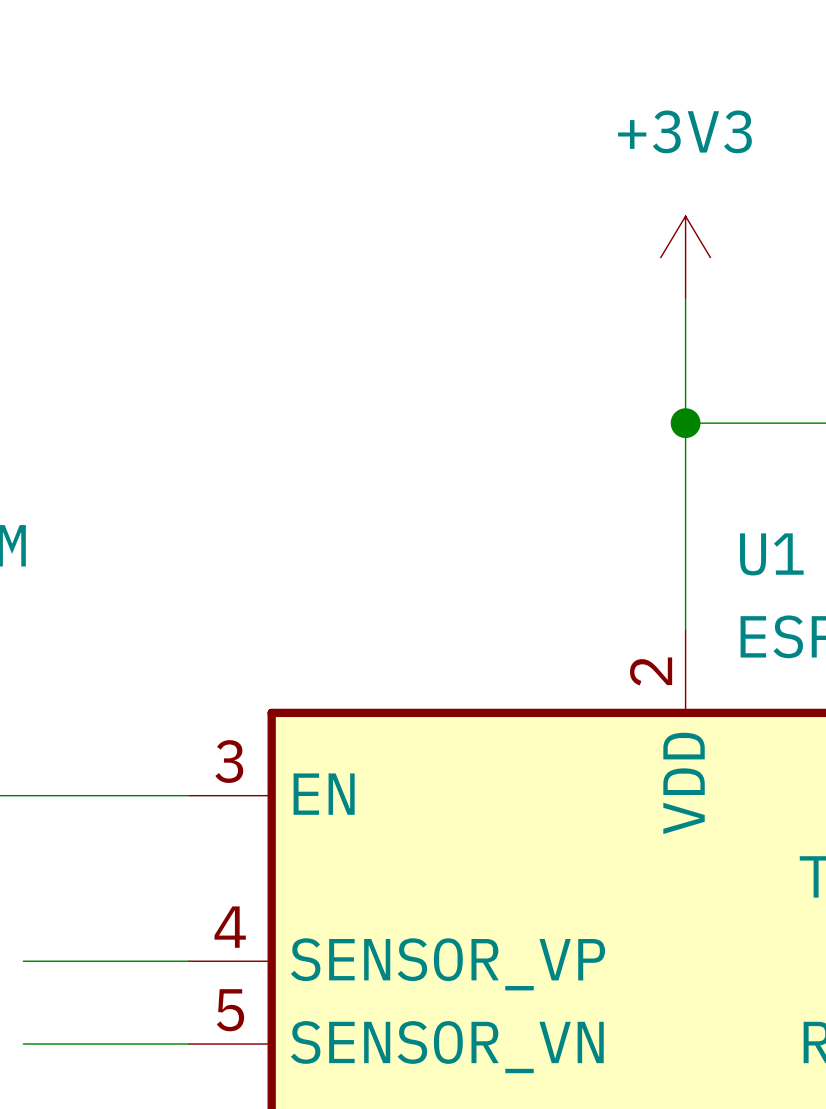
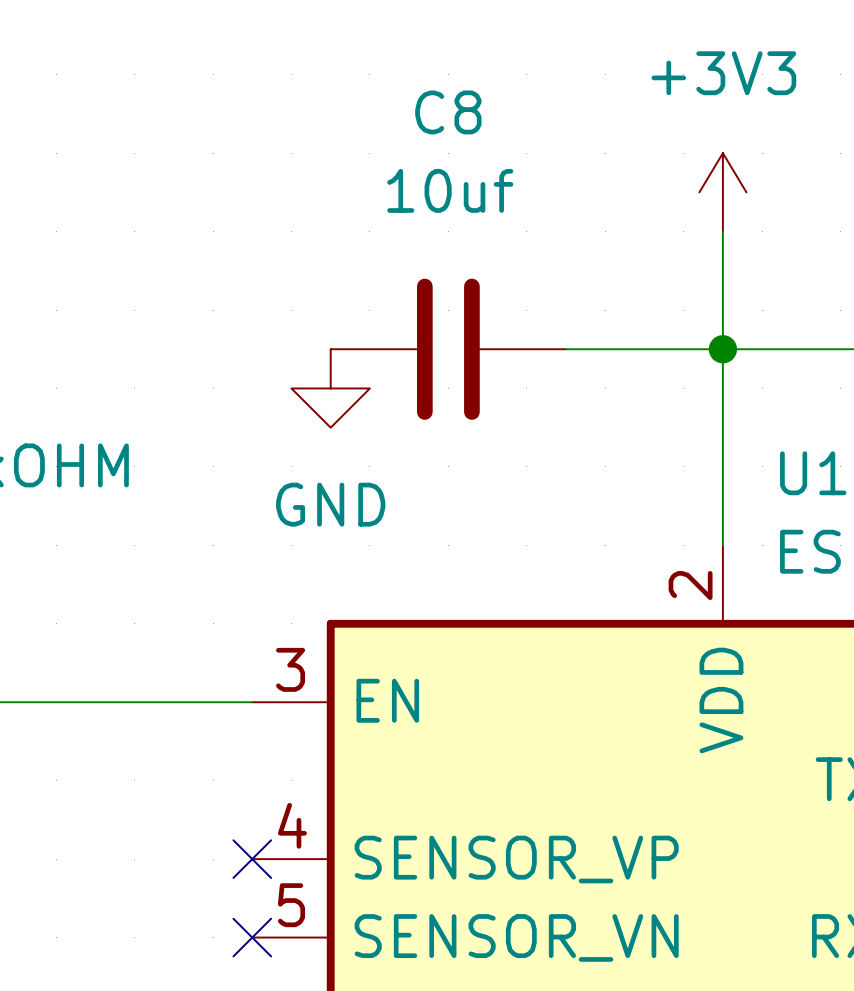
C8: none -> 10uf (448, 349)
power symbol: none -> GND (330, 388)
wire: (23, 961) (188, 961) -> (566, 349) (722, 349)
no-connect mark: none -> (252, 859)
wire: (23, 1044) (188, 1044) -> none
no-connect mark: none -> (252, 937)

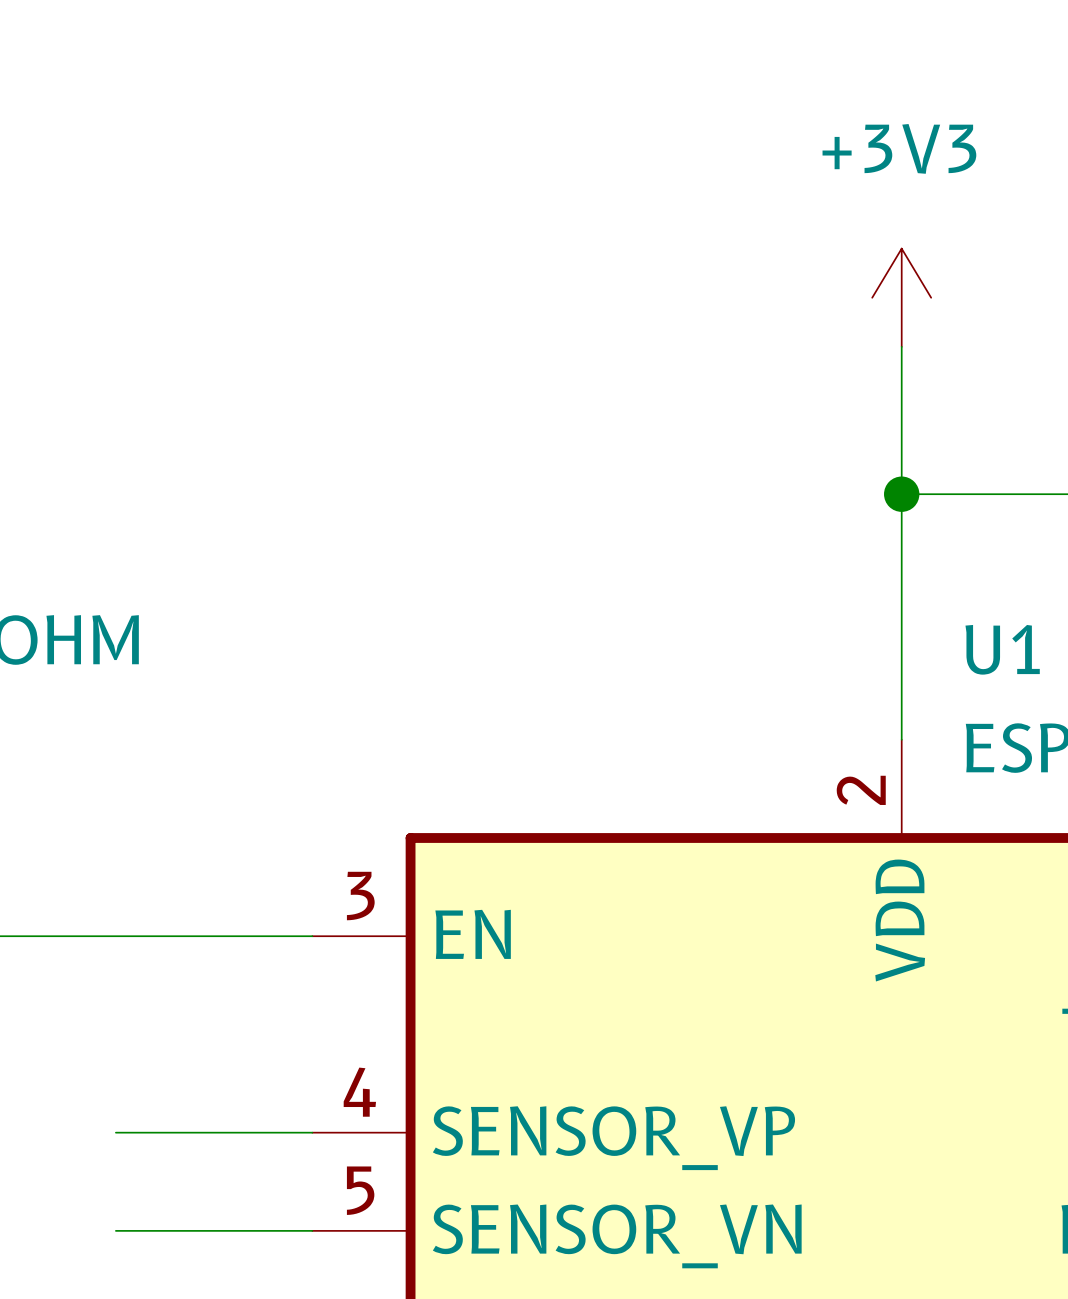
C8: 10uf (448, 349) -> none
wire: (566, 349) (722, 349) -> (115, 1132) (312, 1132)
power symbol: GND (330, 388) -> none
no-connect mark: (252, 859) -> none
wire: none -> (115, 1230) (312, 1230)
no-connect mark: (252, 937) -> none

